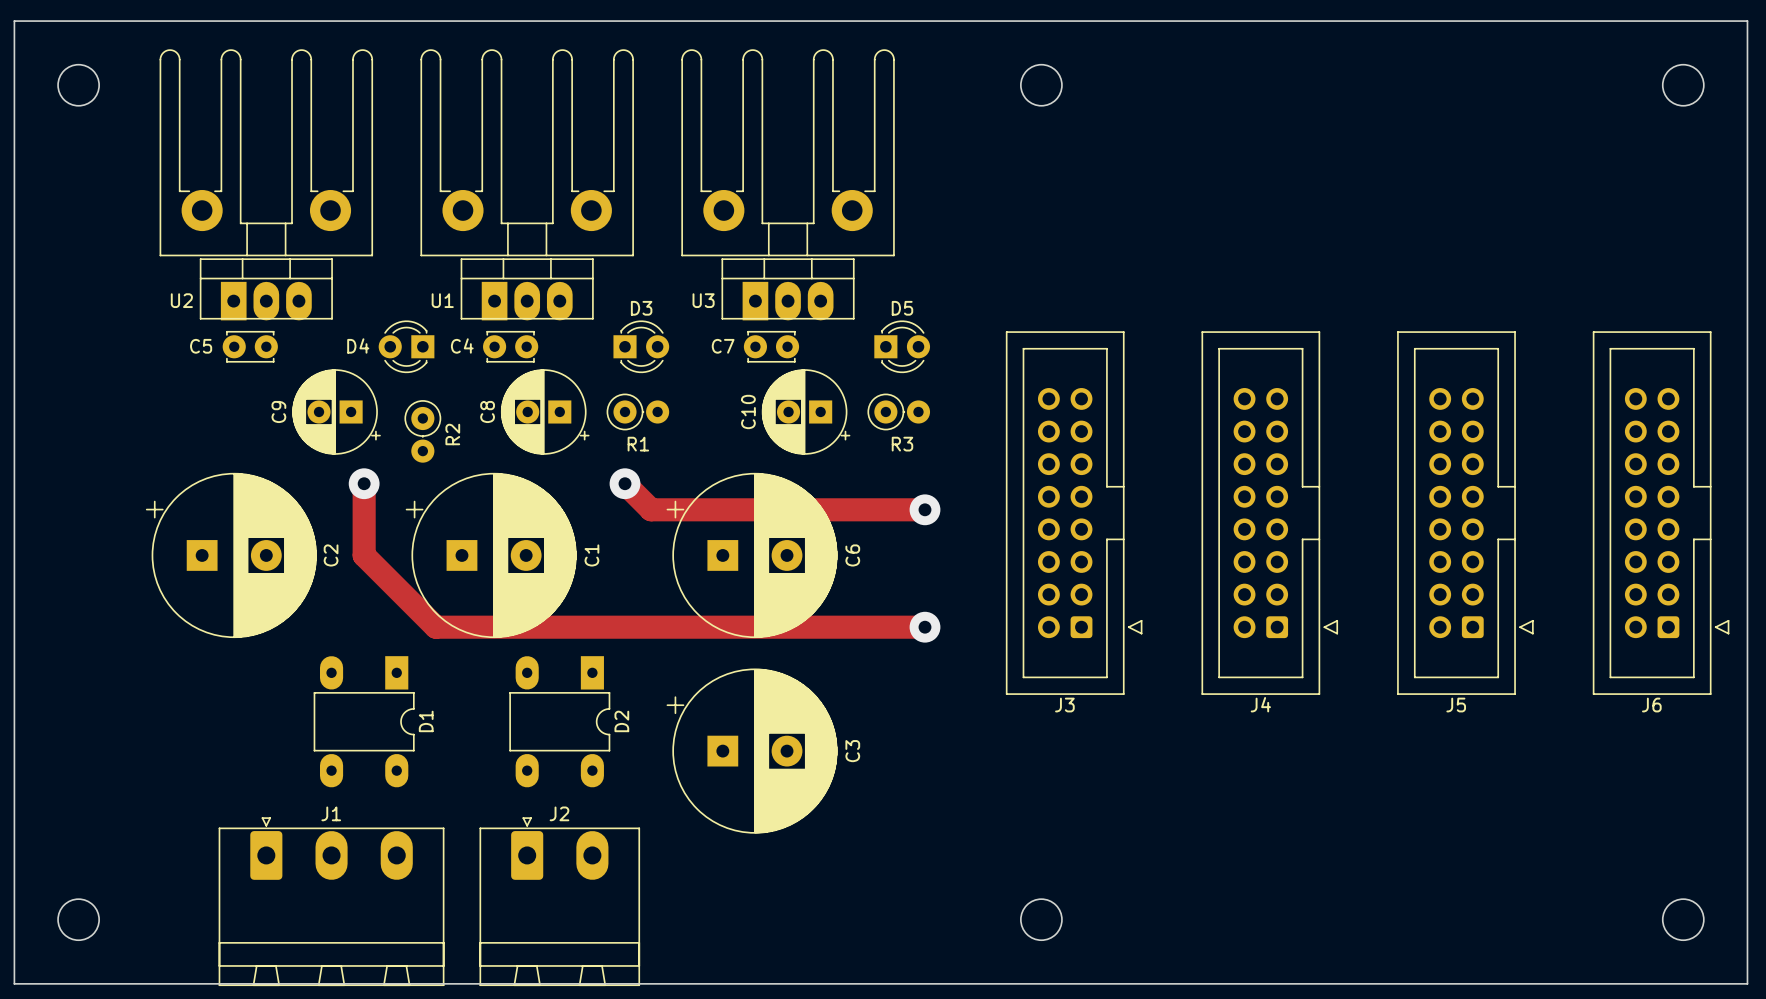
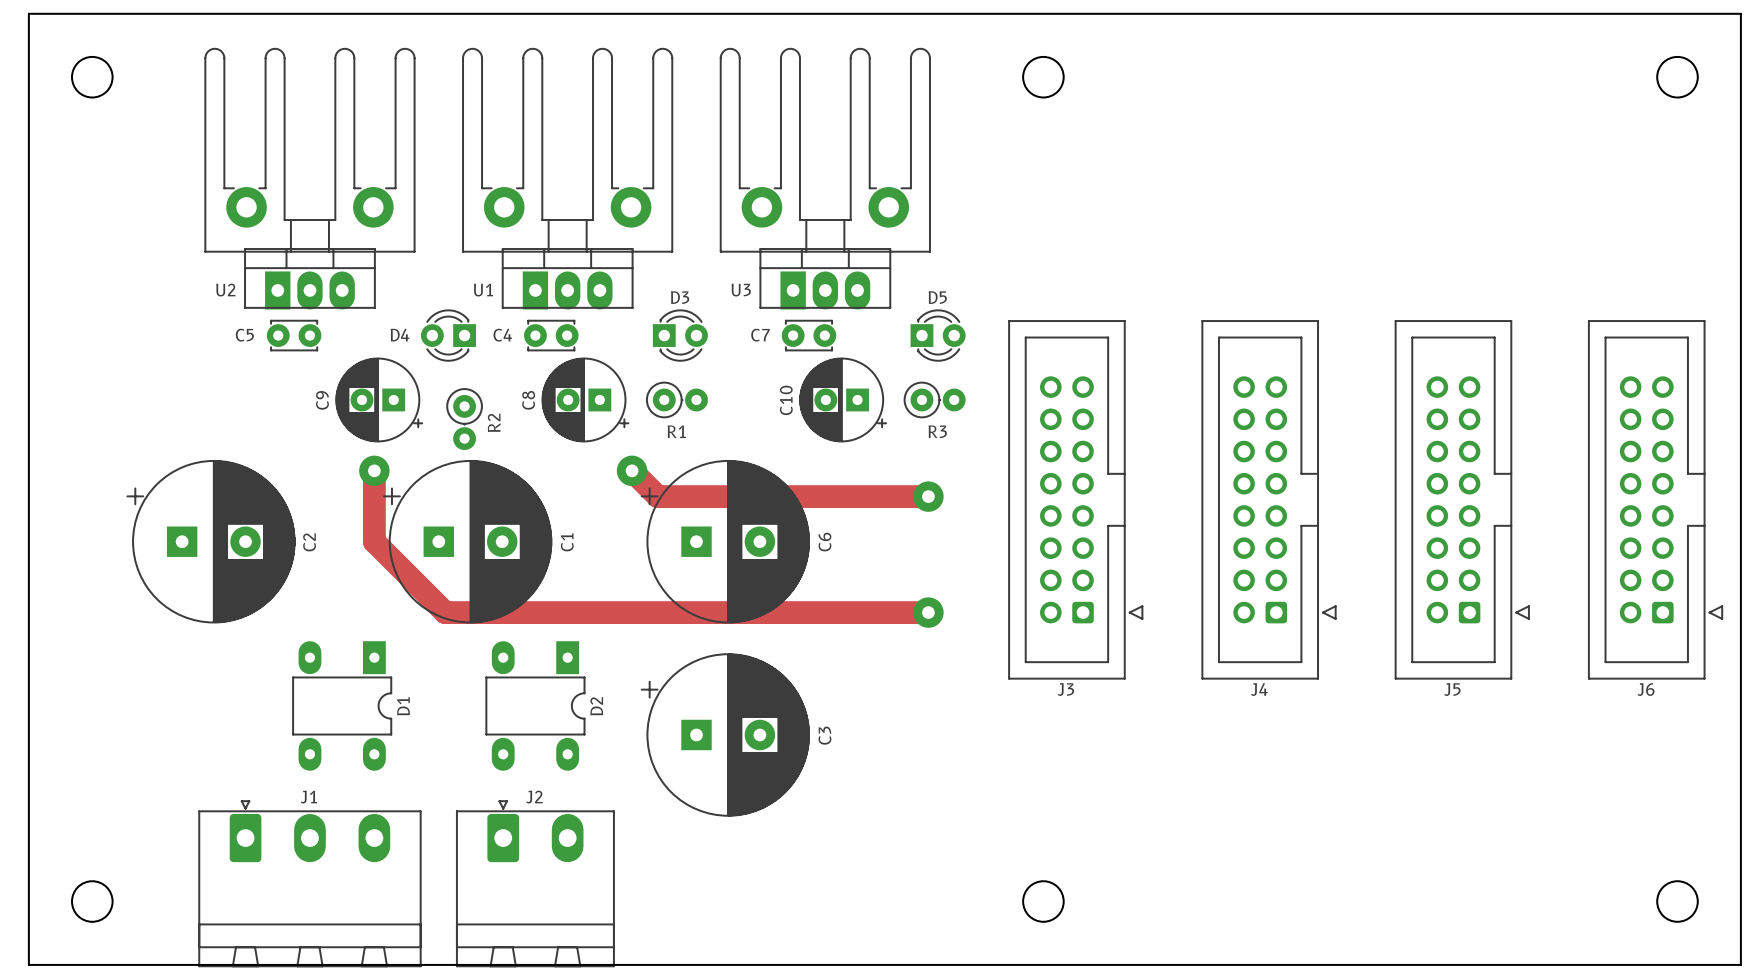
part position: (266, 152) -> (309, 150)
part position: (527, 152) -> (567, 150)
part position: (788, 152) -> (825, 150)
U2 position: (266, 289) -> (309, 278)
U1 position: (527, 289) -> (567, 278)
U3 position: (788, 289) -> (825, 278)
C5 position: (250, 346) -> (294, 335)
D4 position: (406, 346) -> (448, 335)
C4 position: (510, 346) -> (551, 335)
D3 position: (641, 346) -> (680, 335)
C7 position: (771, 346) -> (808, 335)
D5 position: (902, 346) -> (938, 335)
C9 position: (336, 411) -> (379, 399)
C8 position: (545, 411) -> (585, 399)
R1 position: (637, 411) -> (677, 399)
C10 position: (806, 411) -> (843, 399)
R3 position: (898, 411) -> (934, 399)
R2 position: (422, 431) -> (464, 419)
C2 position: (231, 555) -> (211, 541)
C1 position: (491, 555) -> (467, 541)
C6 position: (752, 555) -> (725, 541)
D1 position: (364, 721) -> (342, 705)
D2 position: (559, 721) -> (535, 705)
C3 position: (752, 751) -> (725, 734)
J1 position: (331, 901) -> (309, 883)
J2 position: (559, 901) -> (535, 883)

